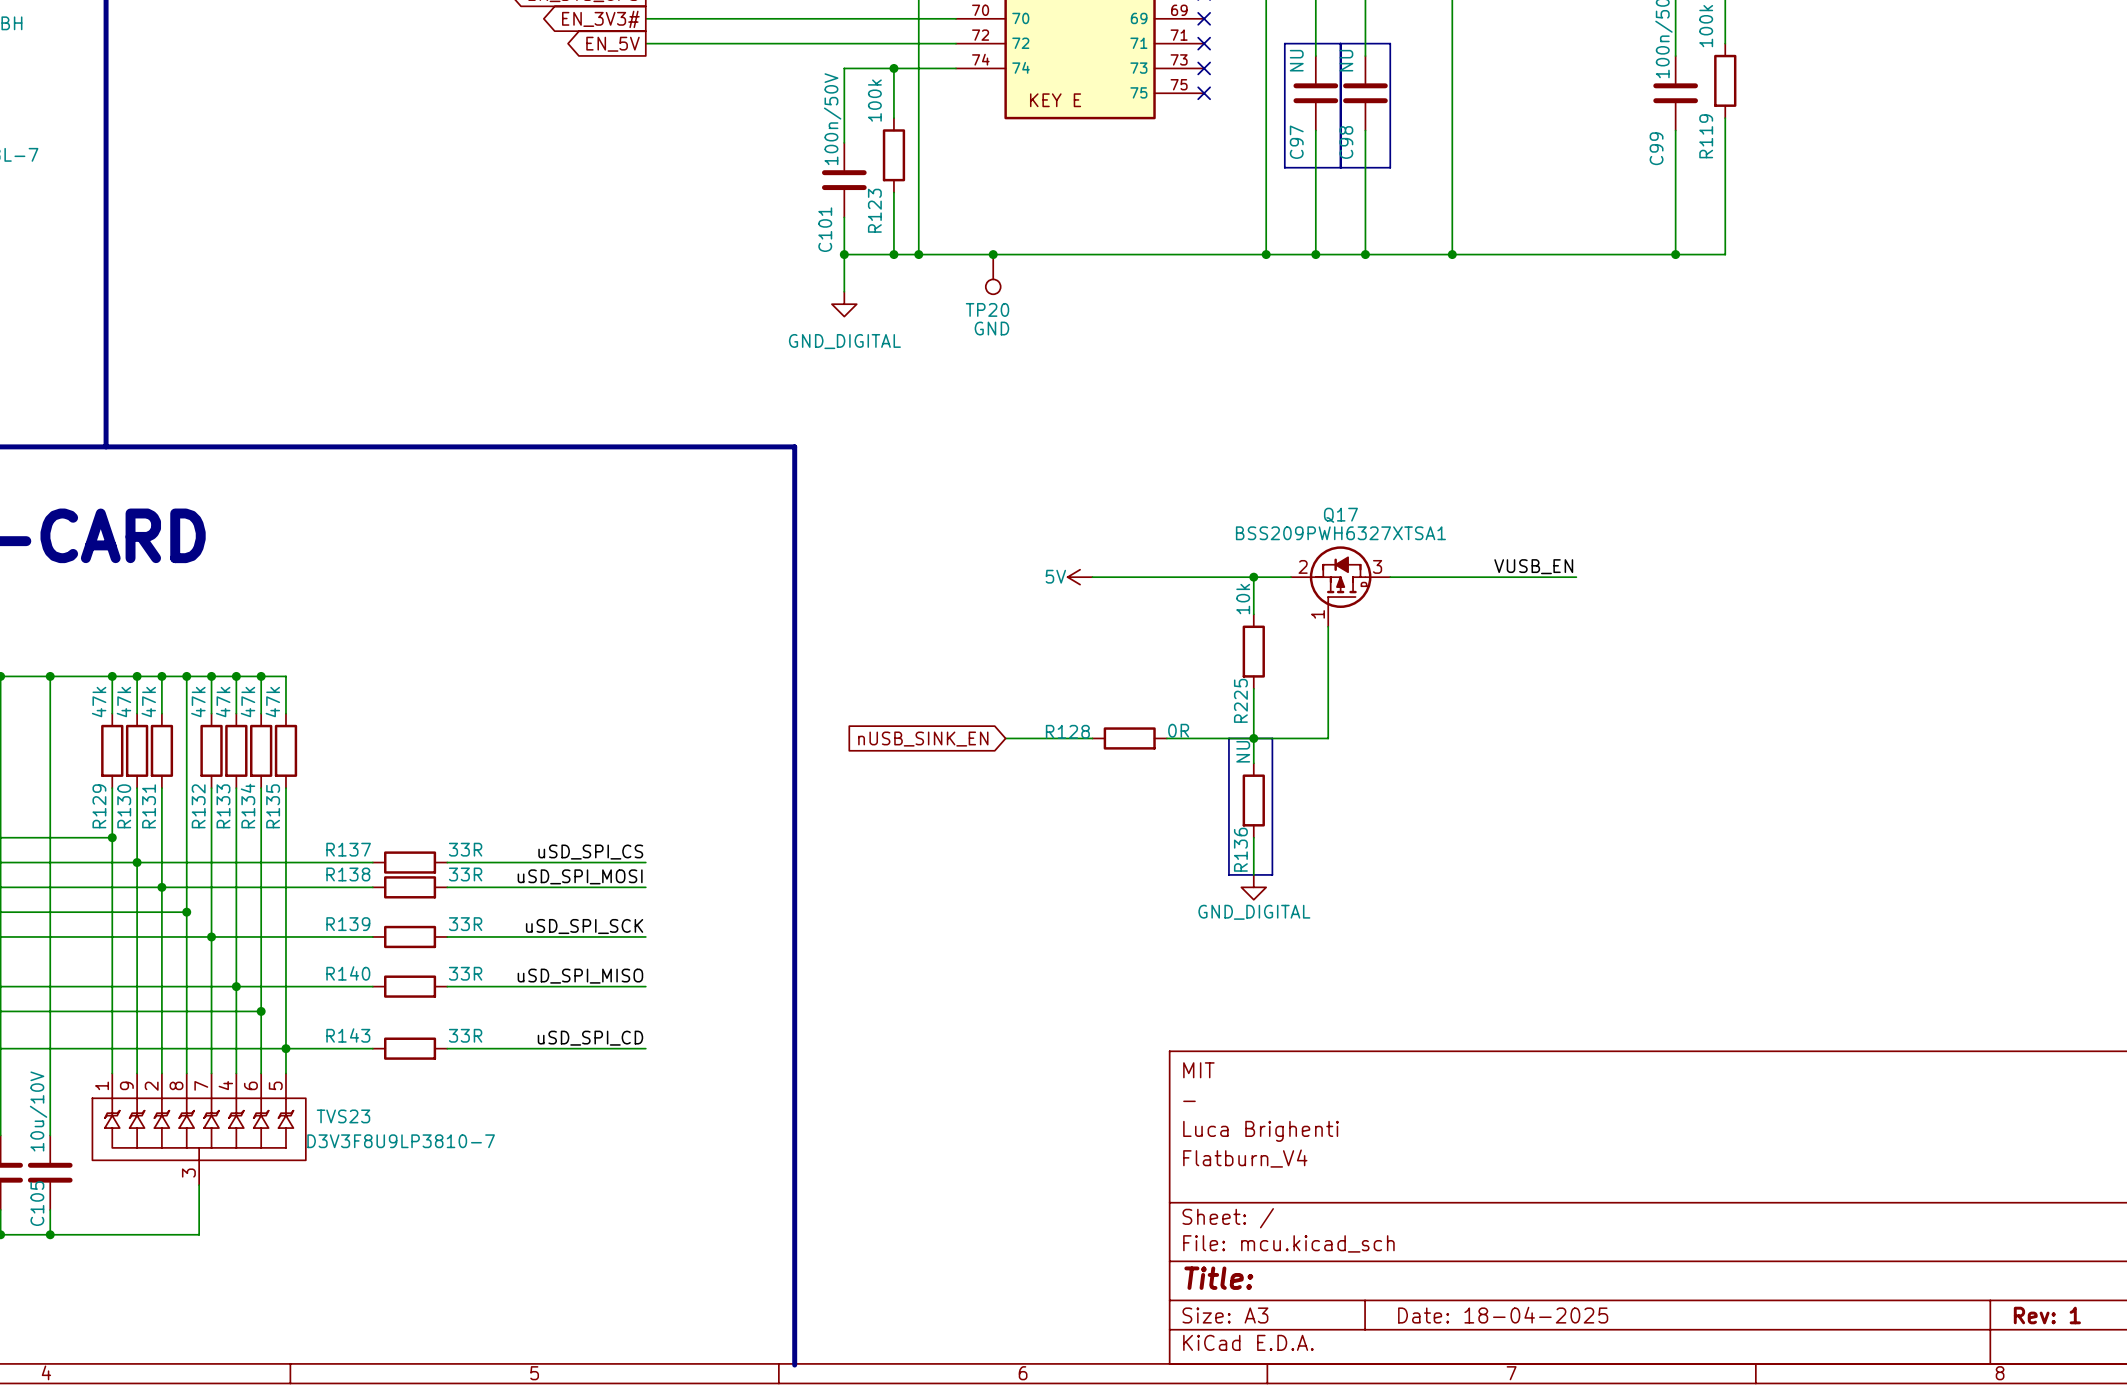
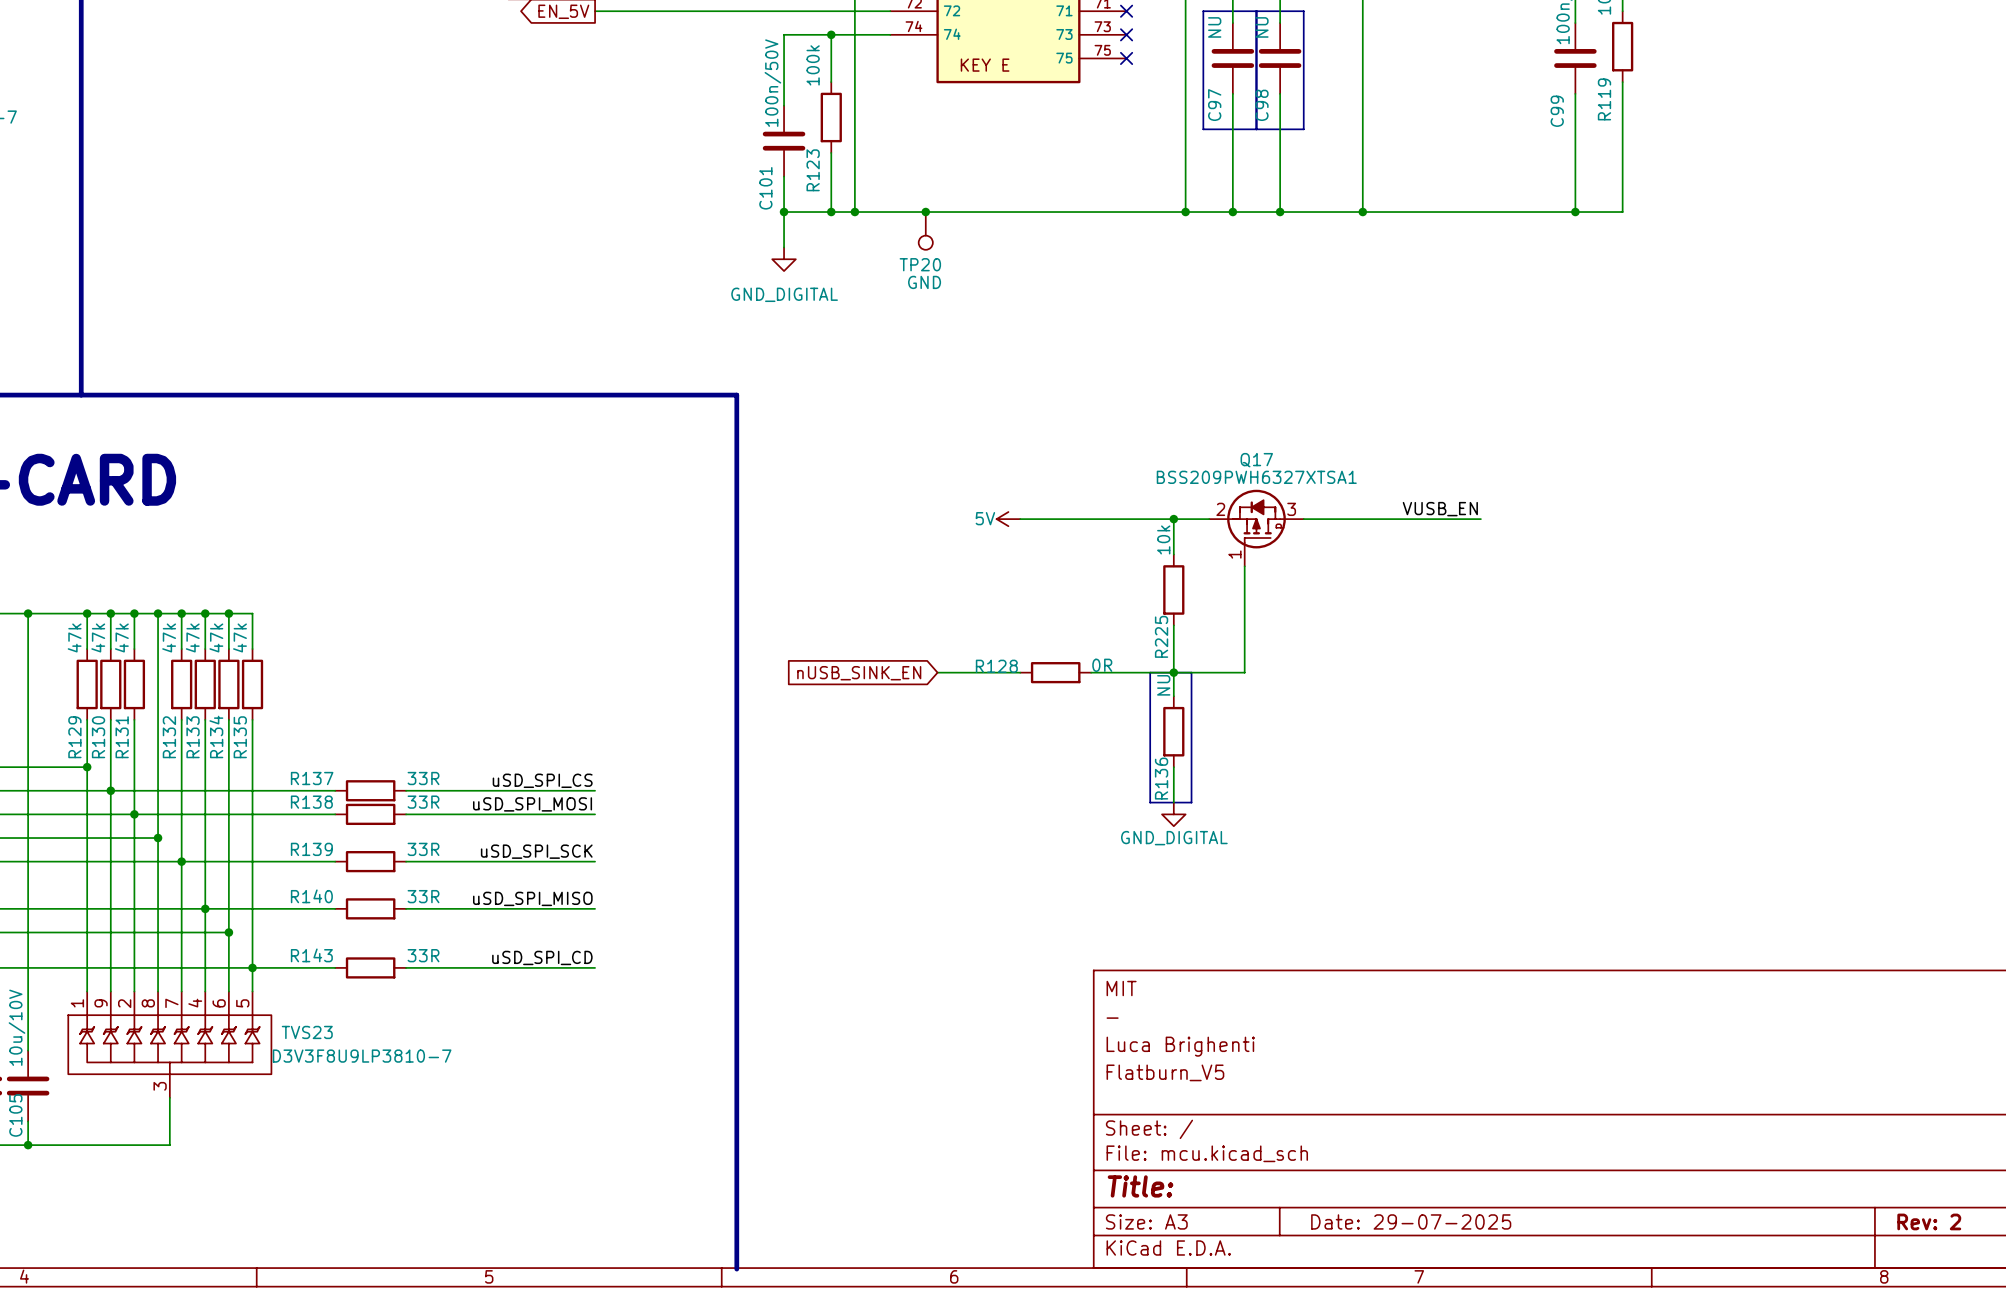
title block: Flatburn_V4 (1245, 1158) -> Flatburn_V5 (1165, 1072)
title block: Date: 18-04-2025 (1503, 1315) -> Date: 29-07-2025 (1411, 1221)
title block: Rev: 1 (2047, 1315) -> Rev: 2 (1929, 1221)

